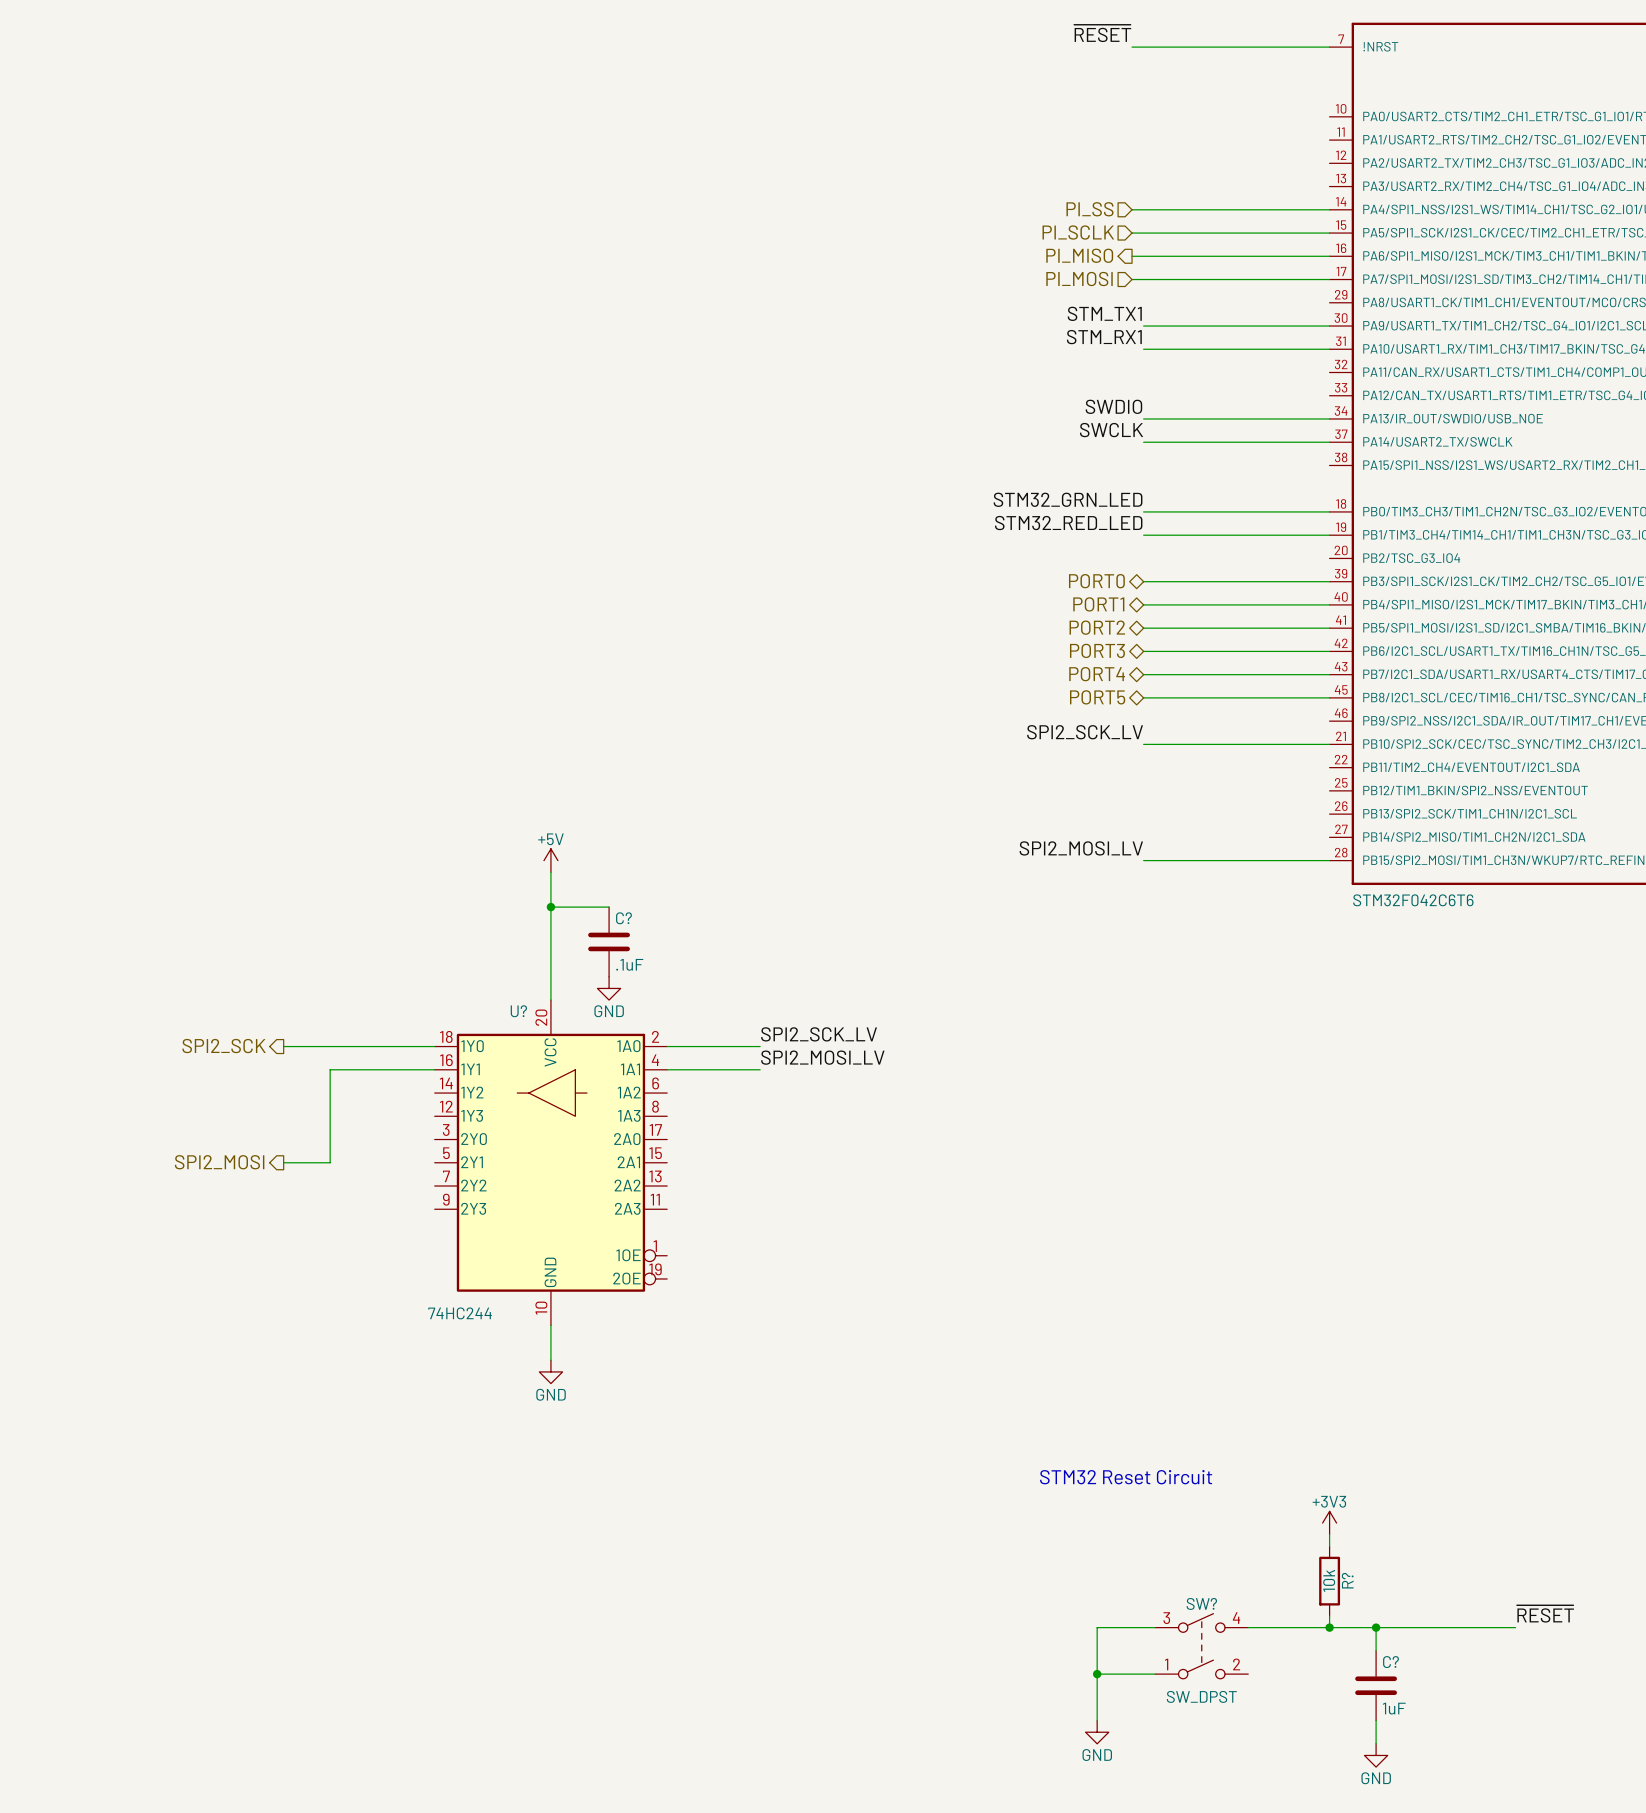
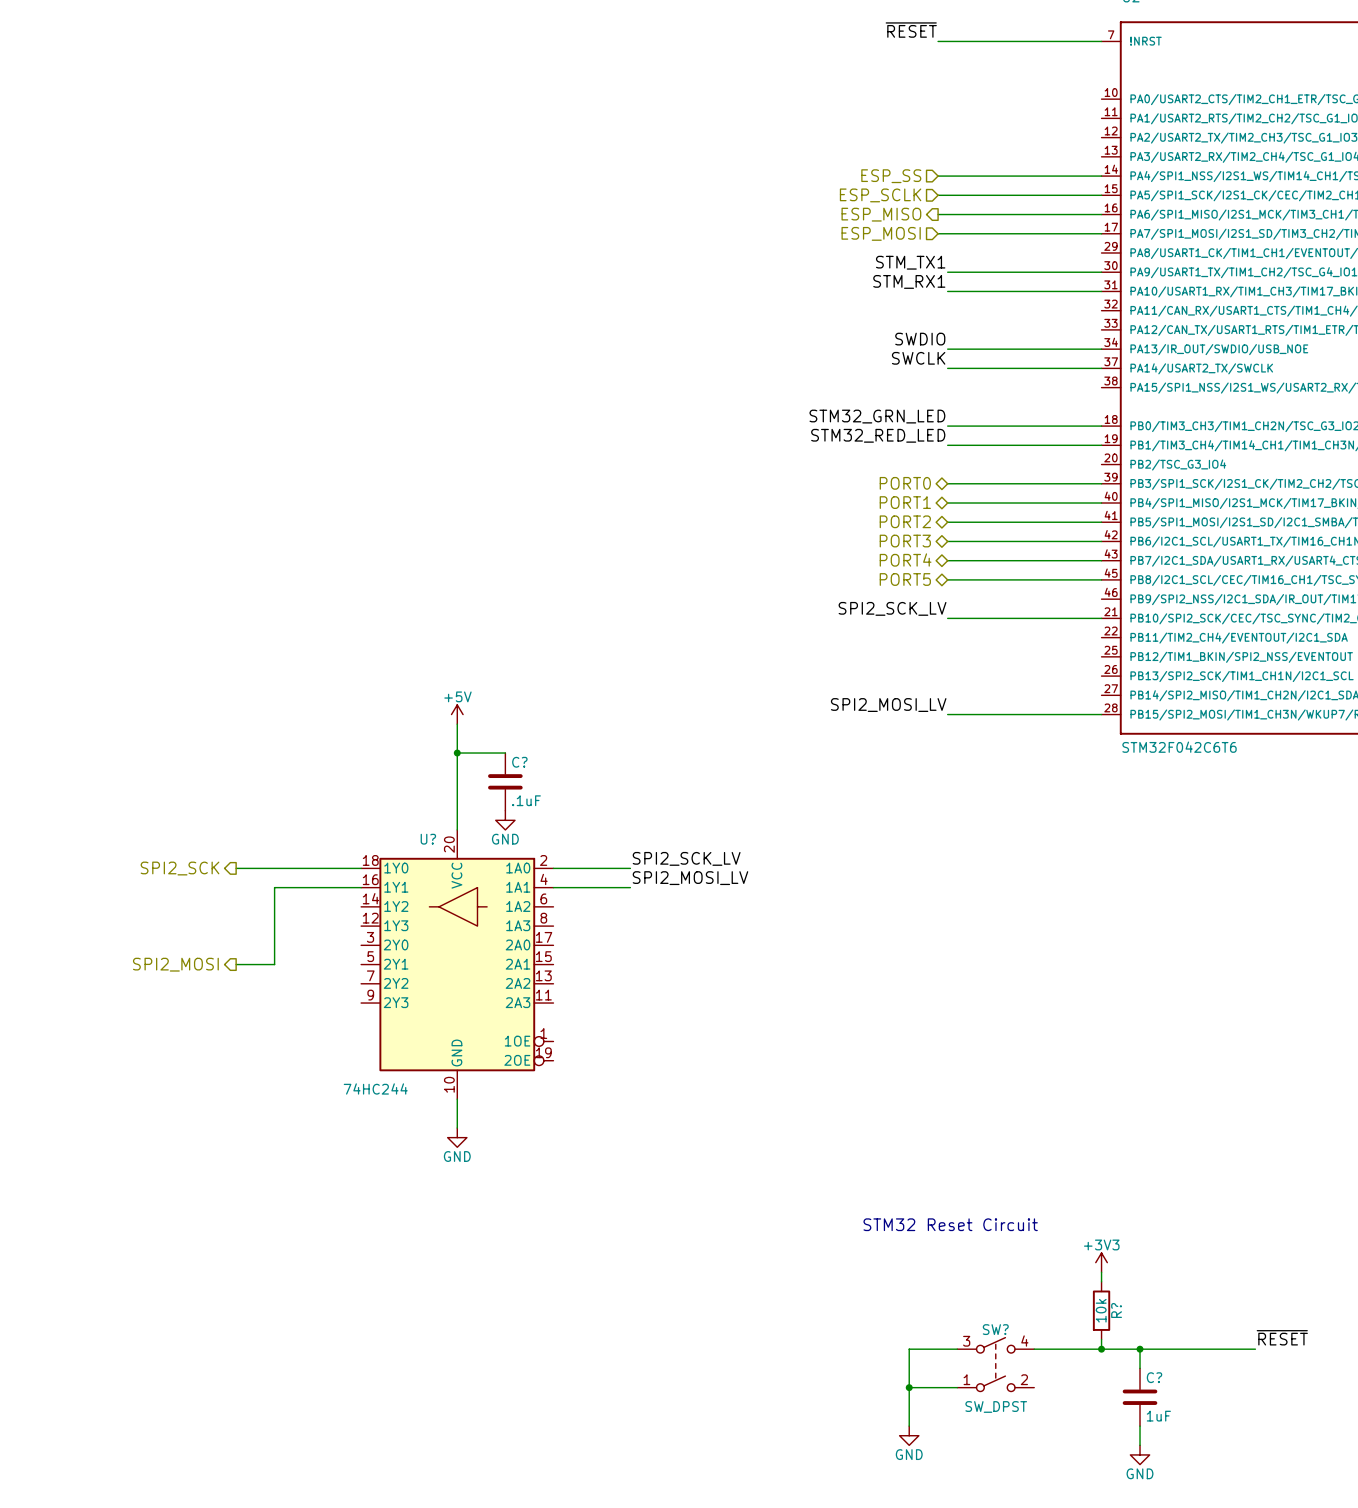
hierarchical label: PI_SS (1089, 209) -> ESP_SS (891, 176)
hierarchical label: PI_SCLK (1078, 232) -> ESP_SCLK (880, 195)
hierarchical label: PI_MISO (1079, 255) -> ESP_MISO (881, 214)
hierarchical label: PI_MOSI (1079, 279) -> ESP_MOSI (881, 233)

